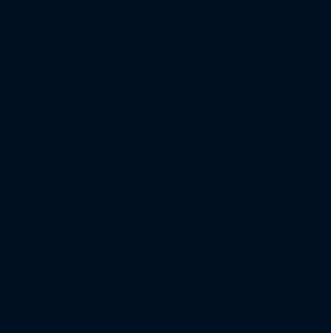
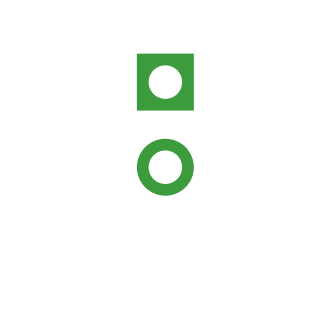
part: none -> (165, 124)

